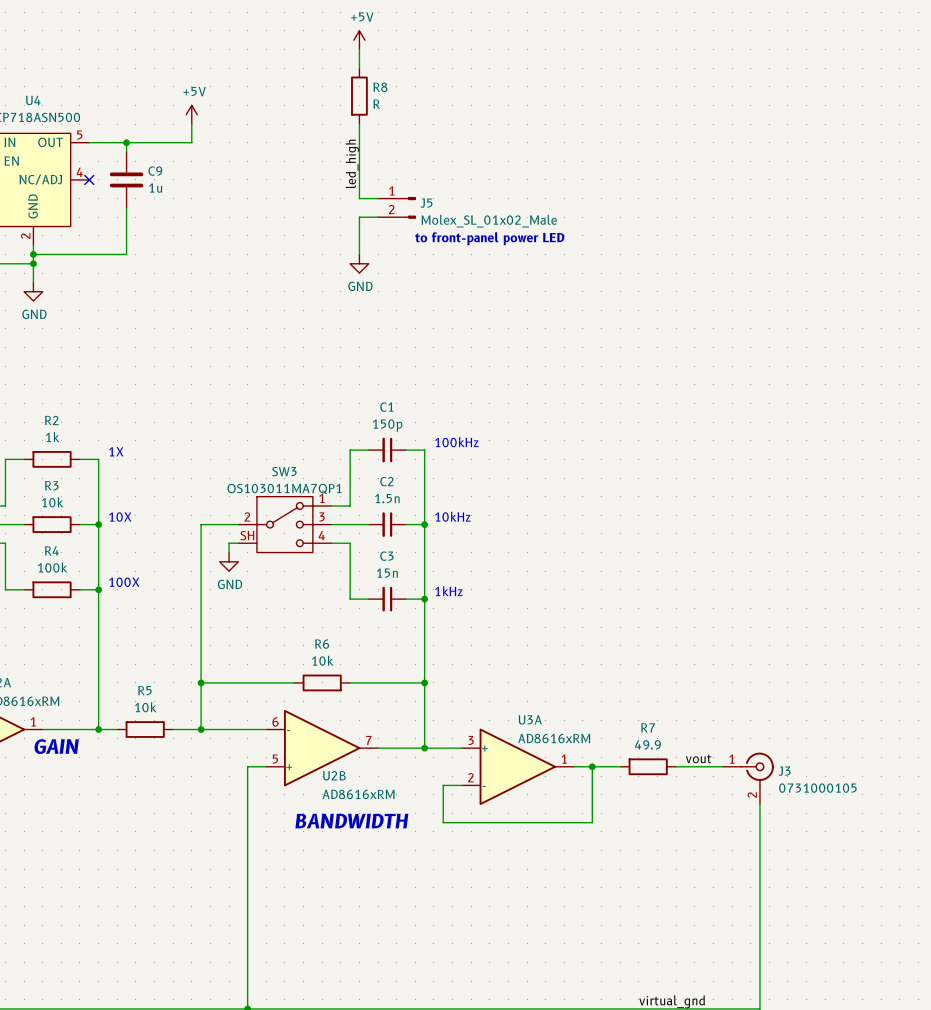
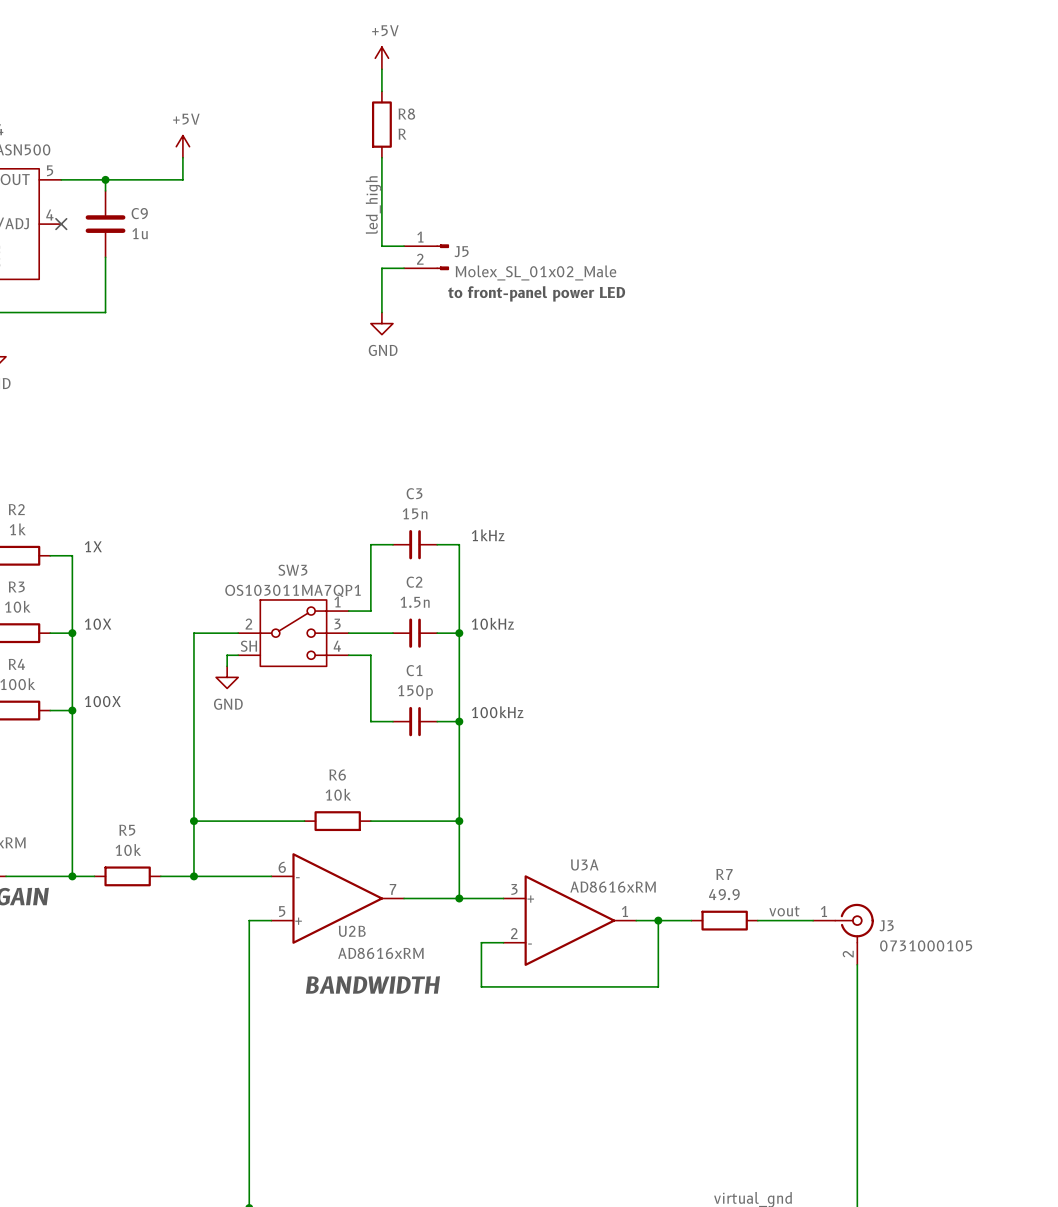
C1 name: C1 (386, 407) -> C3 (414, 493)
C1 value: 150p (387, 425) -> 15n (415, 513)
text: 100kHz (456, 442) -> 1kHz (488, 535)
C3 name: C3 (386, 556) -> C1 (414, 670)
C3 value: 15n (387, 573) -> 150p (415, 692)
text: 1kHz (448, 591) -> 100kHz (497, 712)

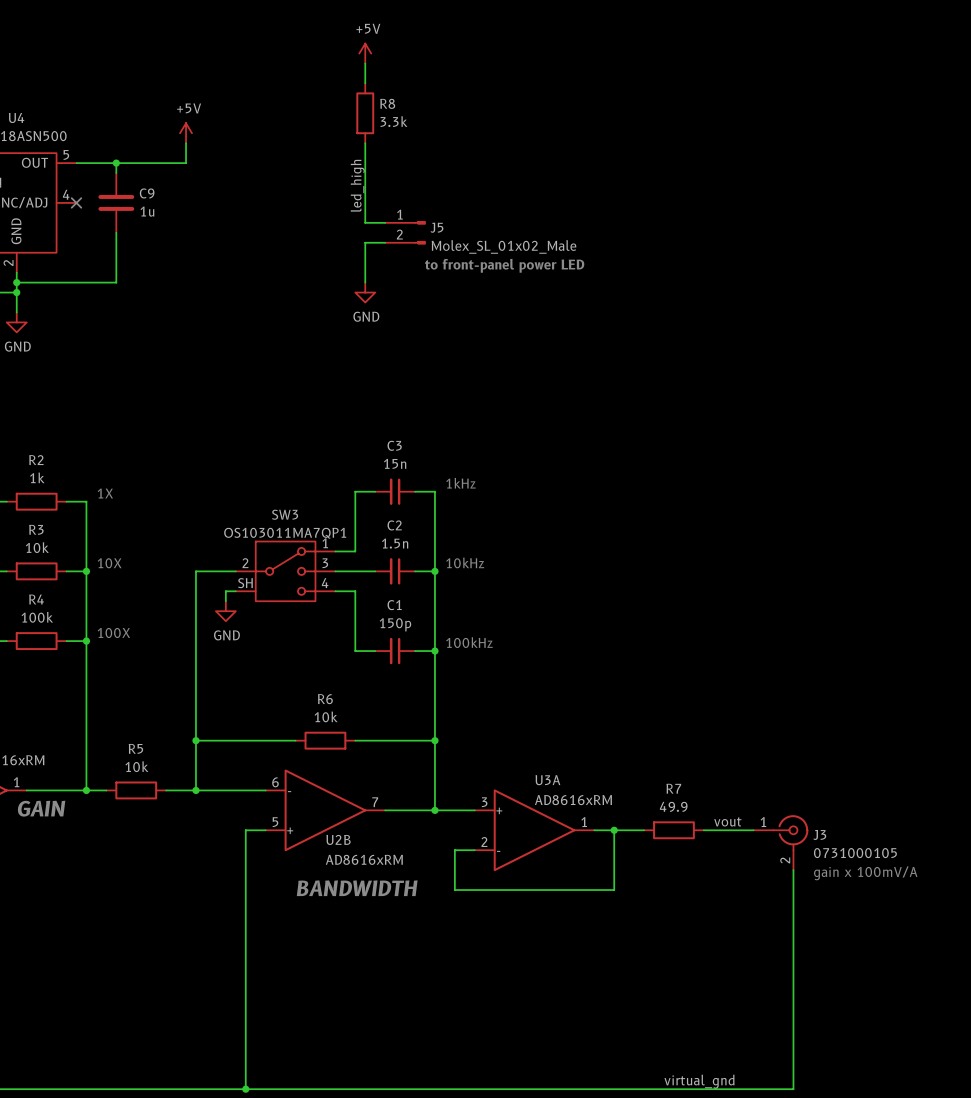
R8 value: R (402, 134) -> 3.3k (393, 121)
text: none -> gain x 100mV/A (865, 873)

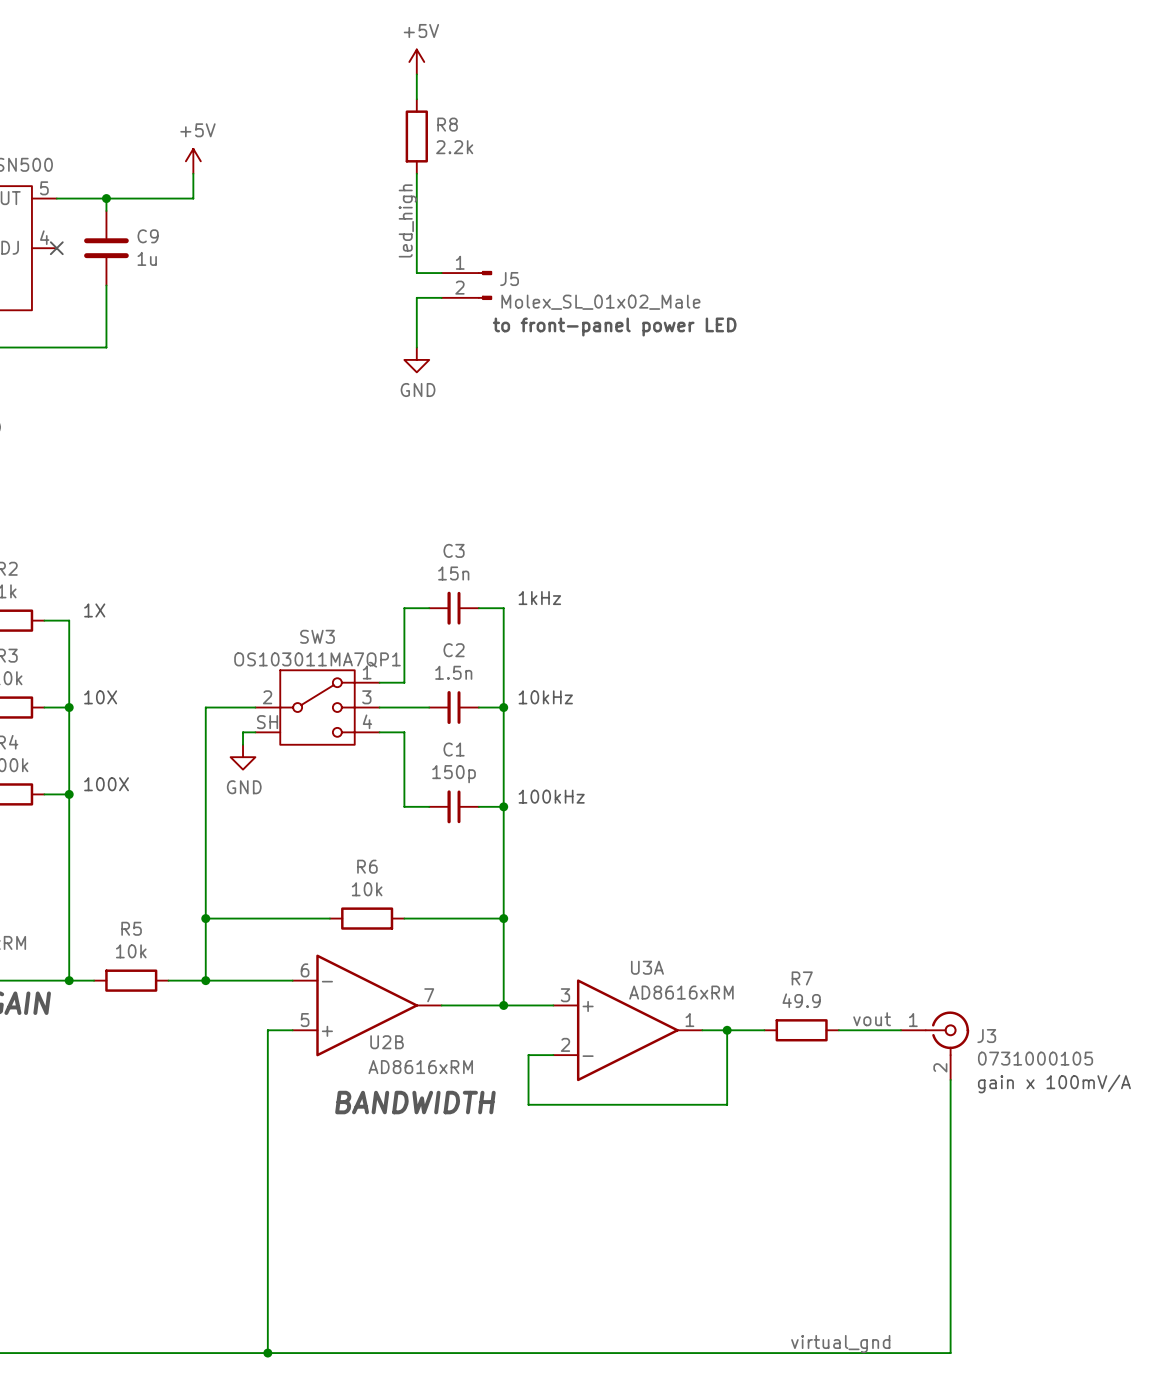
R8 value: 3.3k (393, 121) -> 2.2k (454, 147)

